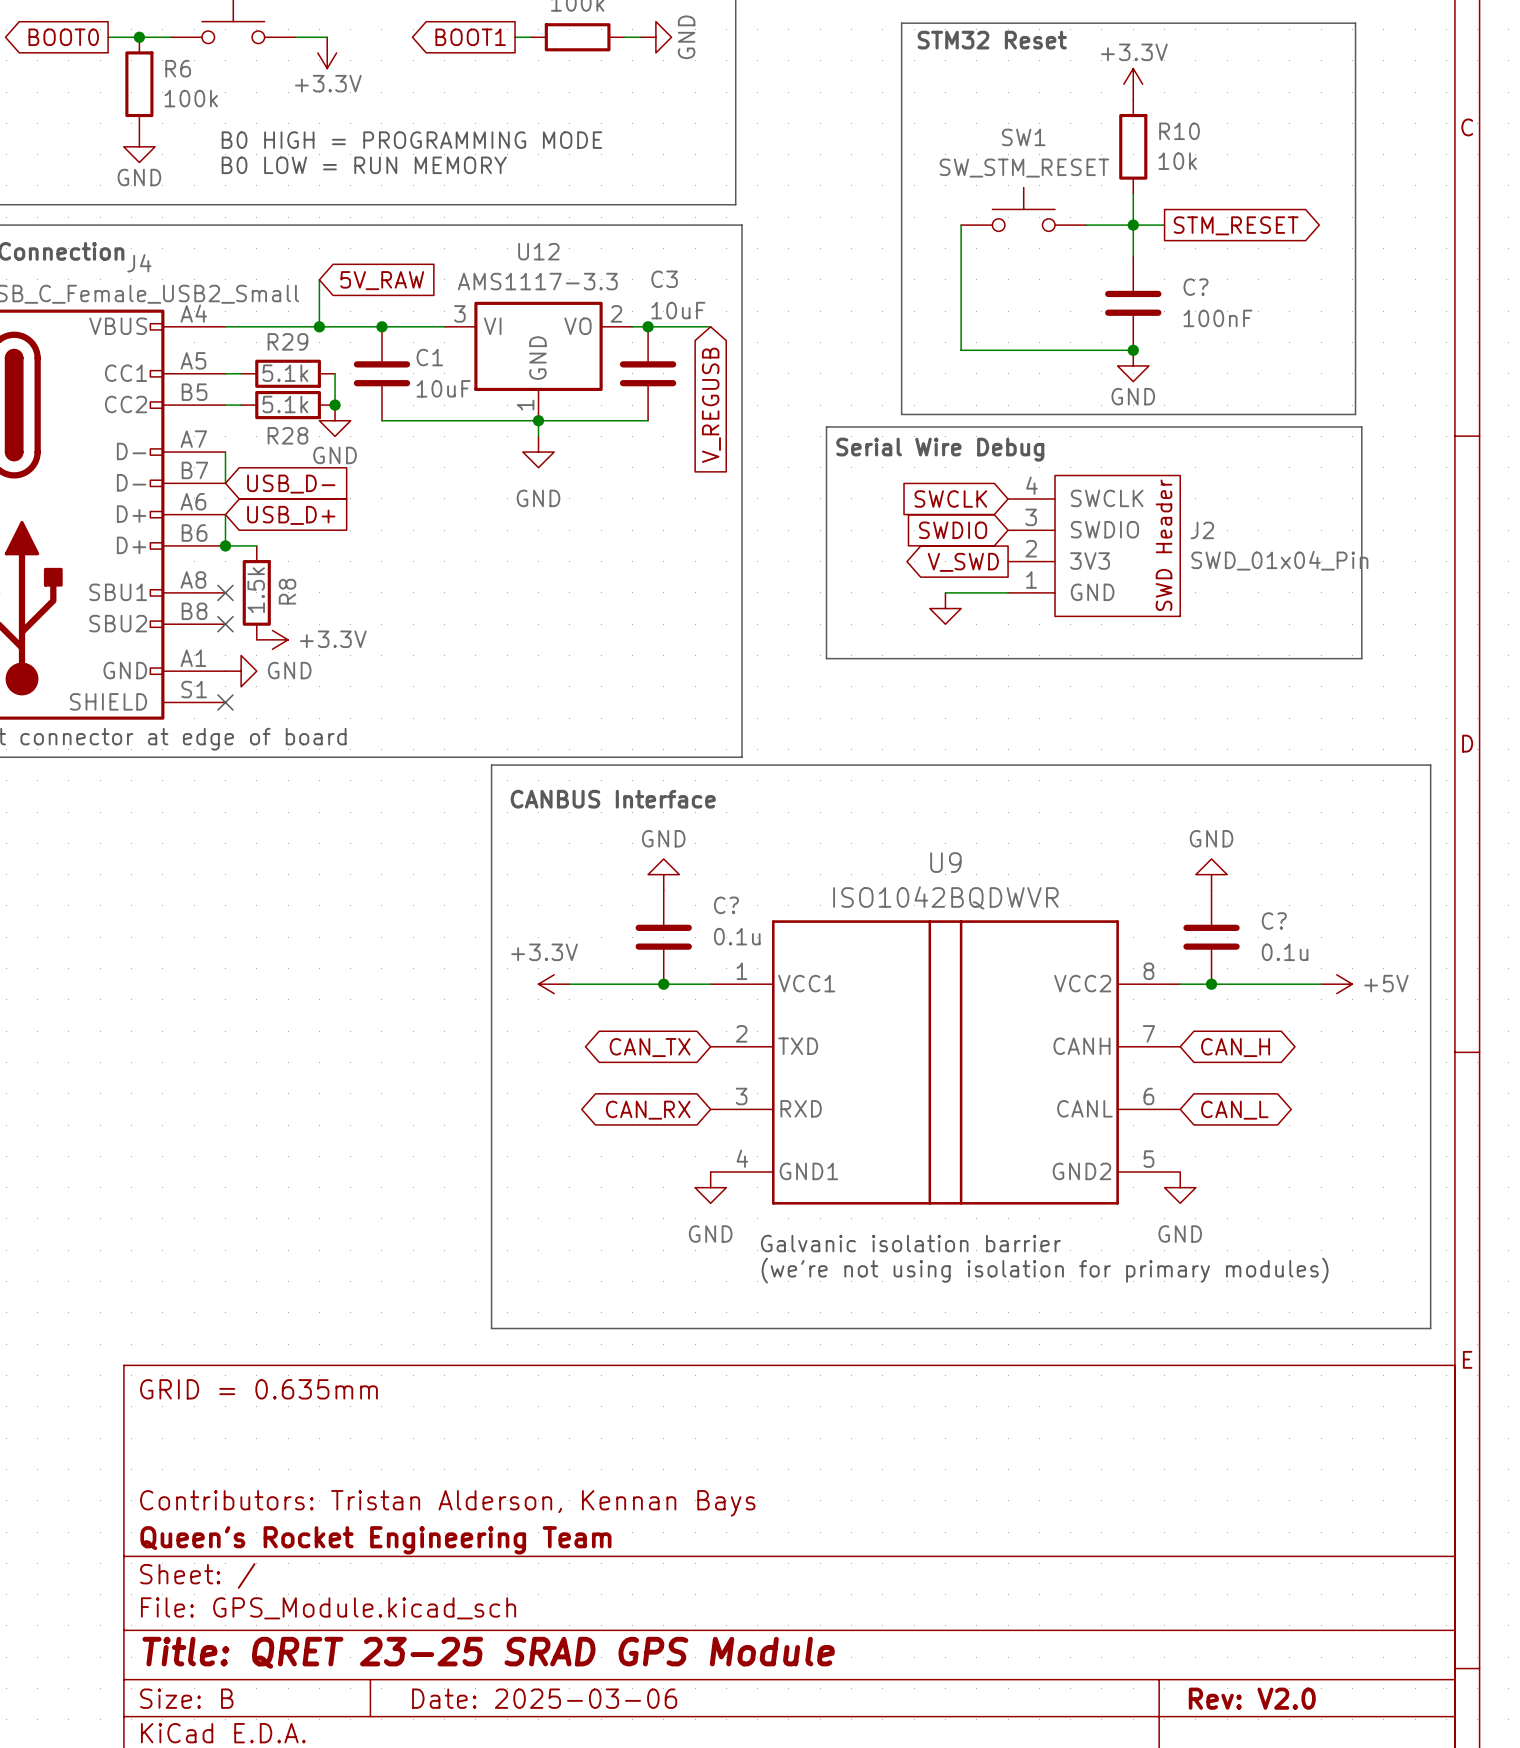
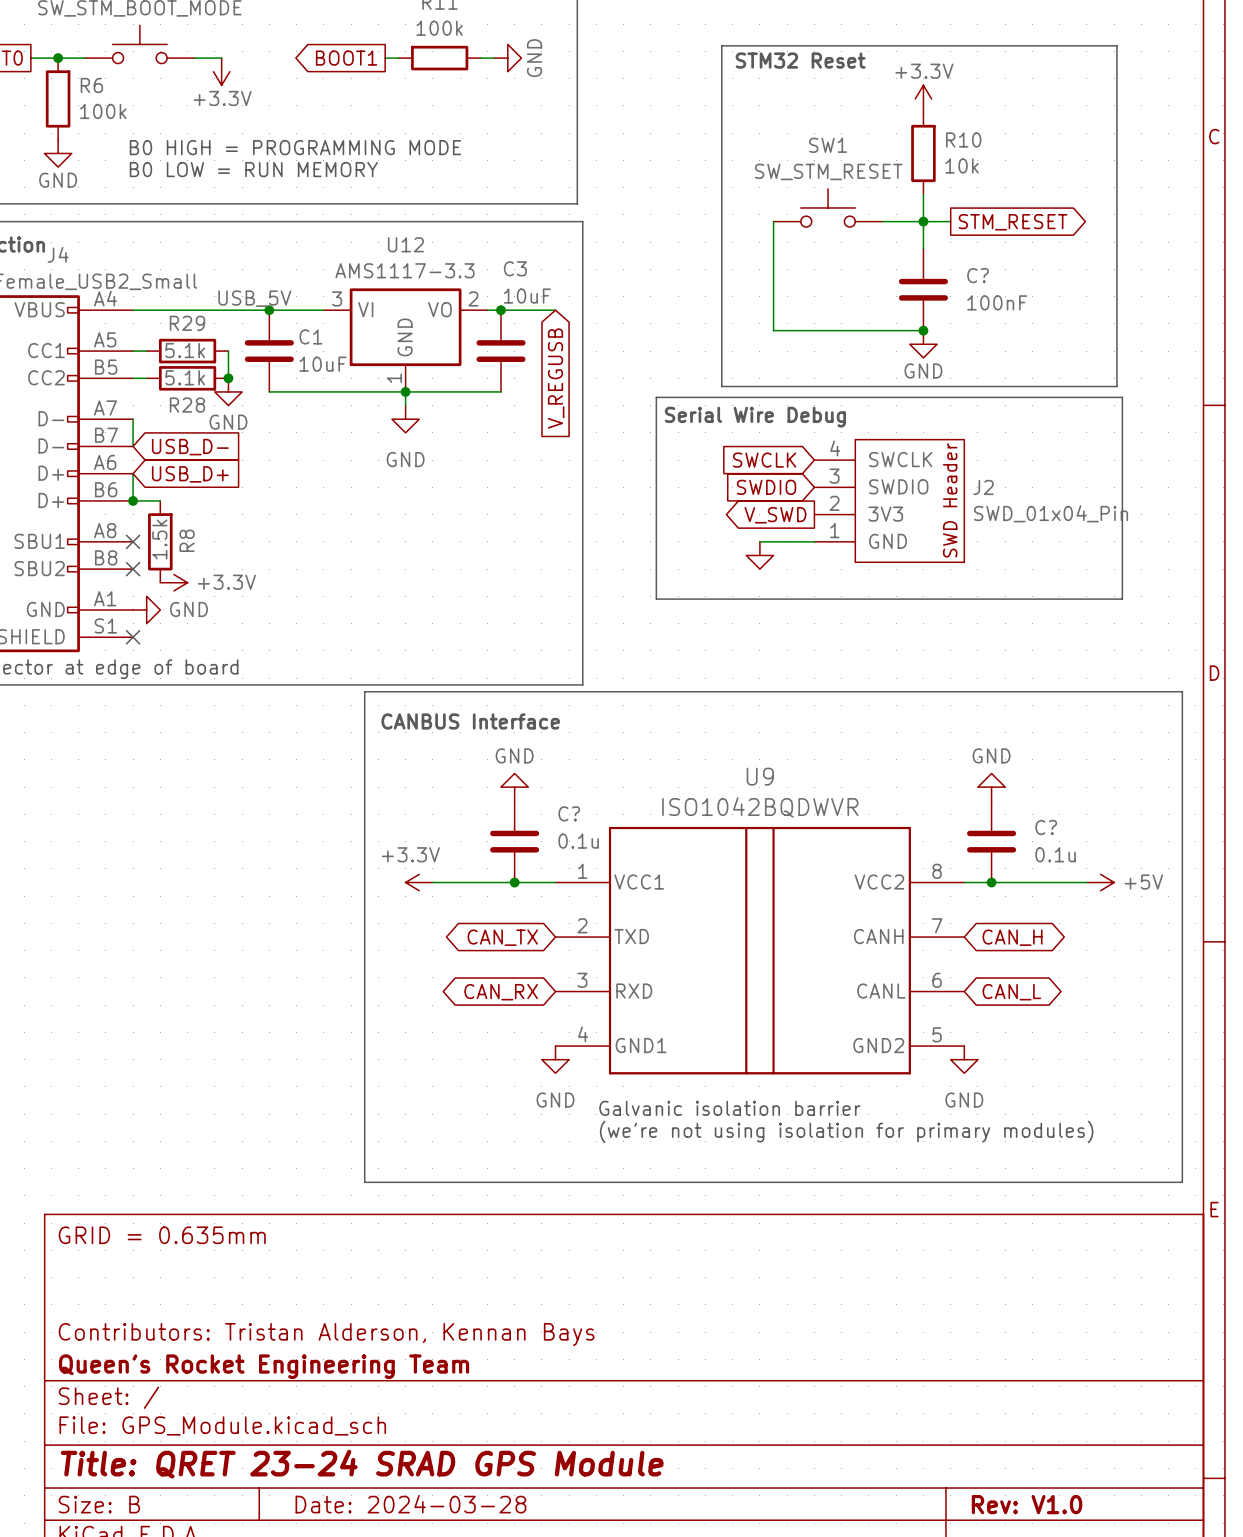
wire: (319, 279) (319, 326) -> none
global label: 5V_RAW (382, 280) -> none
label: none -> USB_5V (254, 298)
junction: (319, 326) -> none
title block: Title: QRET 23-25 SRAD GPS Module (488, 1652) -> Title: QRET 23-24 SRAD GPS Module (362, 1464)
title block: Date: 2025-03-06 (544, 1698) -> Date: 2024-03-28 (410, 1504)
title block: Rev: V2.0 (1252, 1698) -> Rev: V1.0 (1027, 1504)

